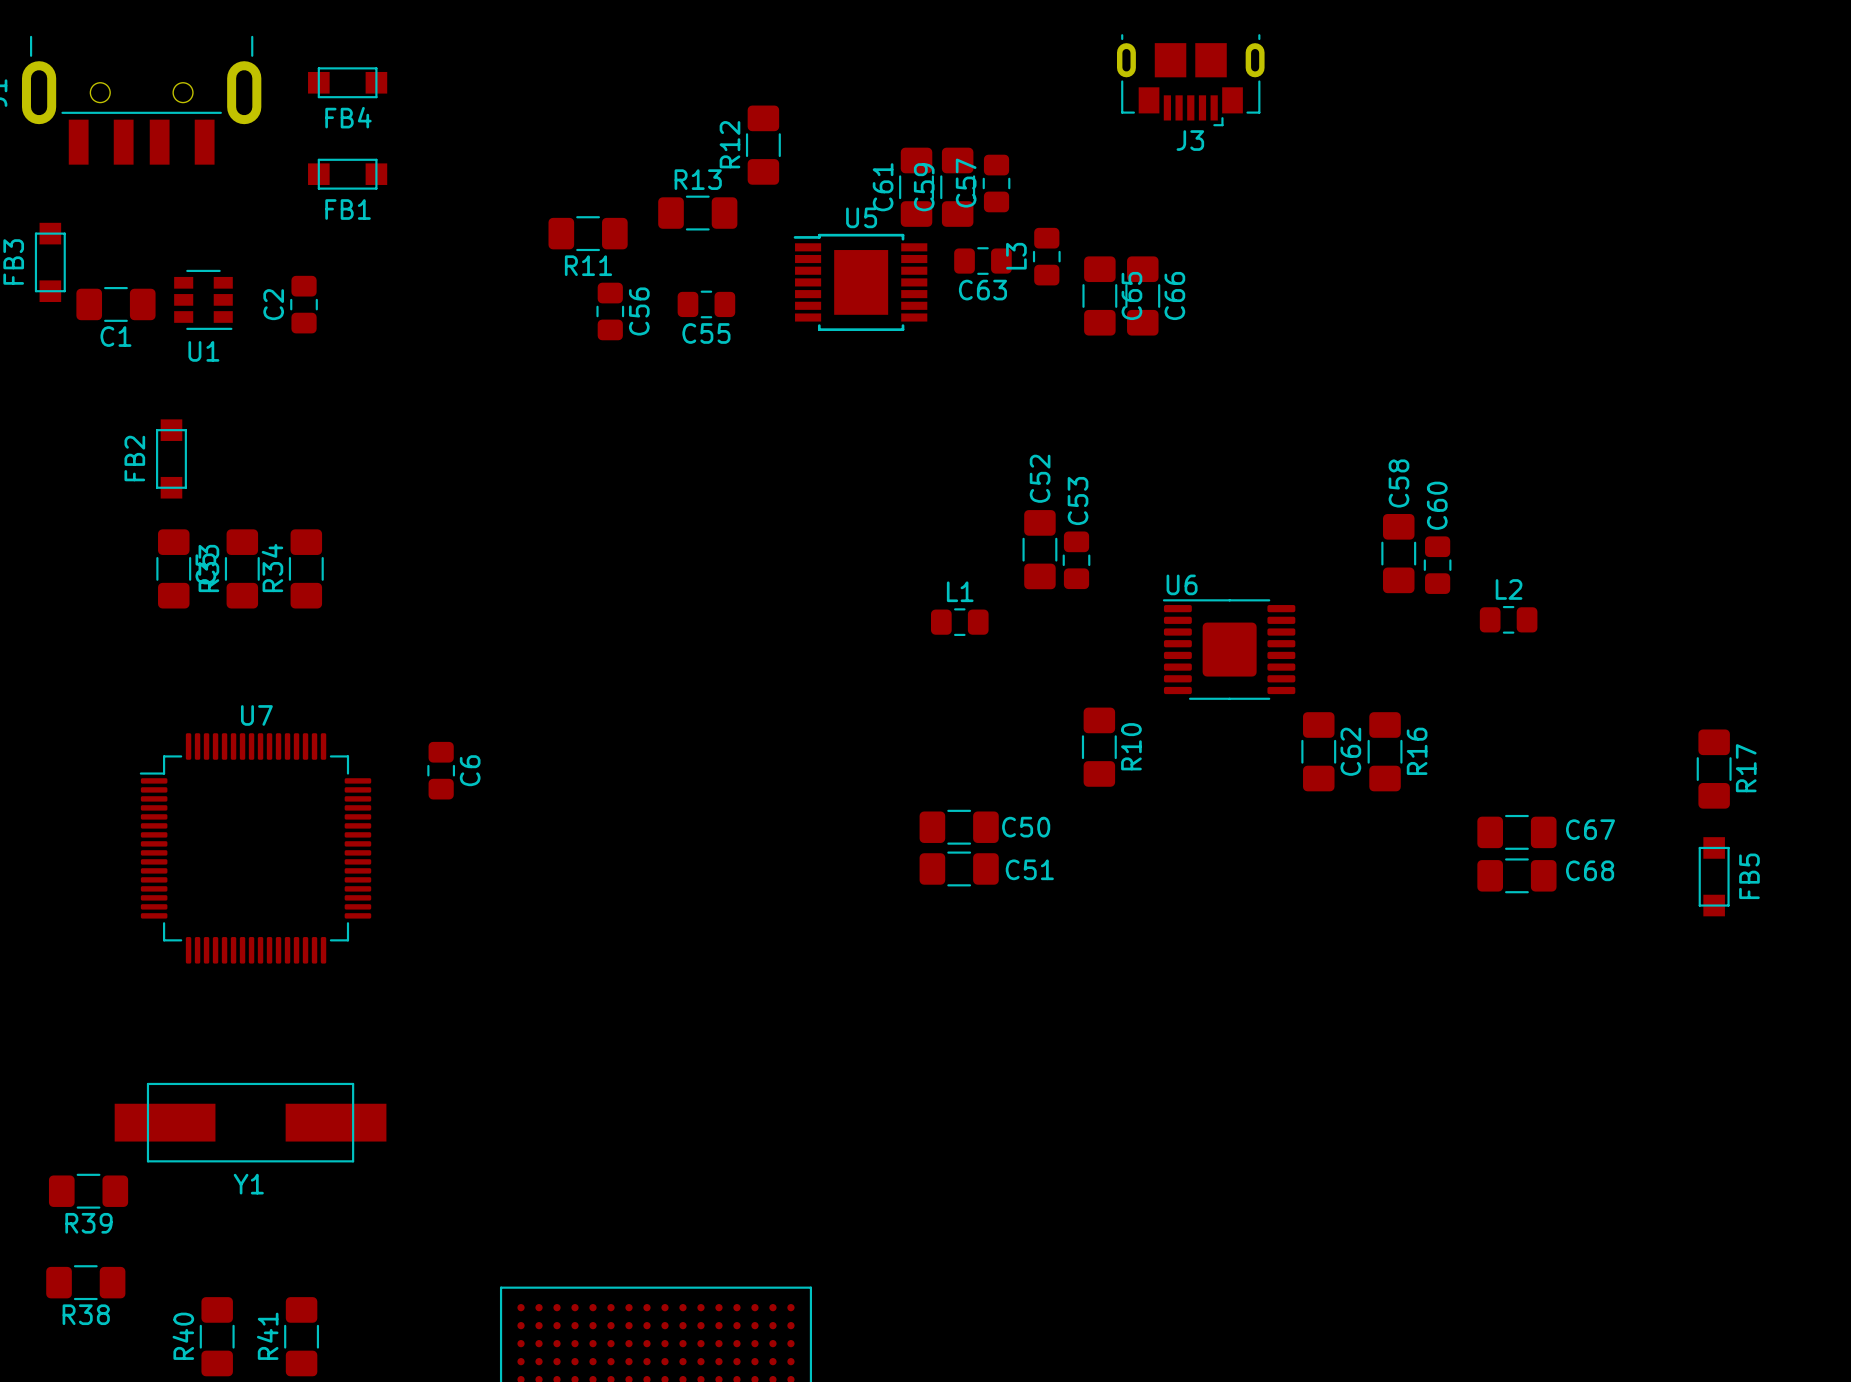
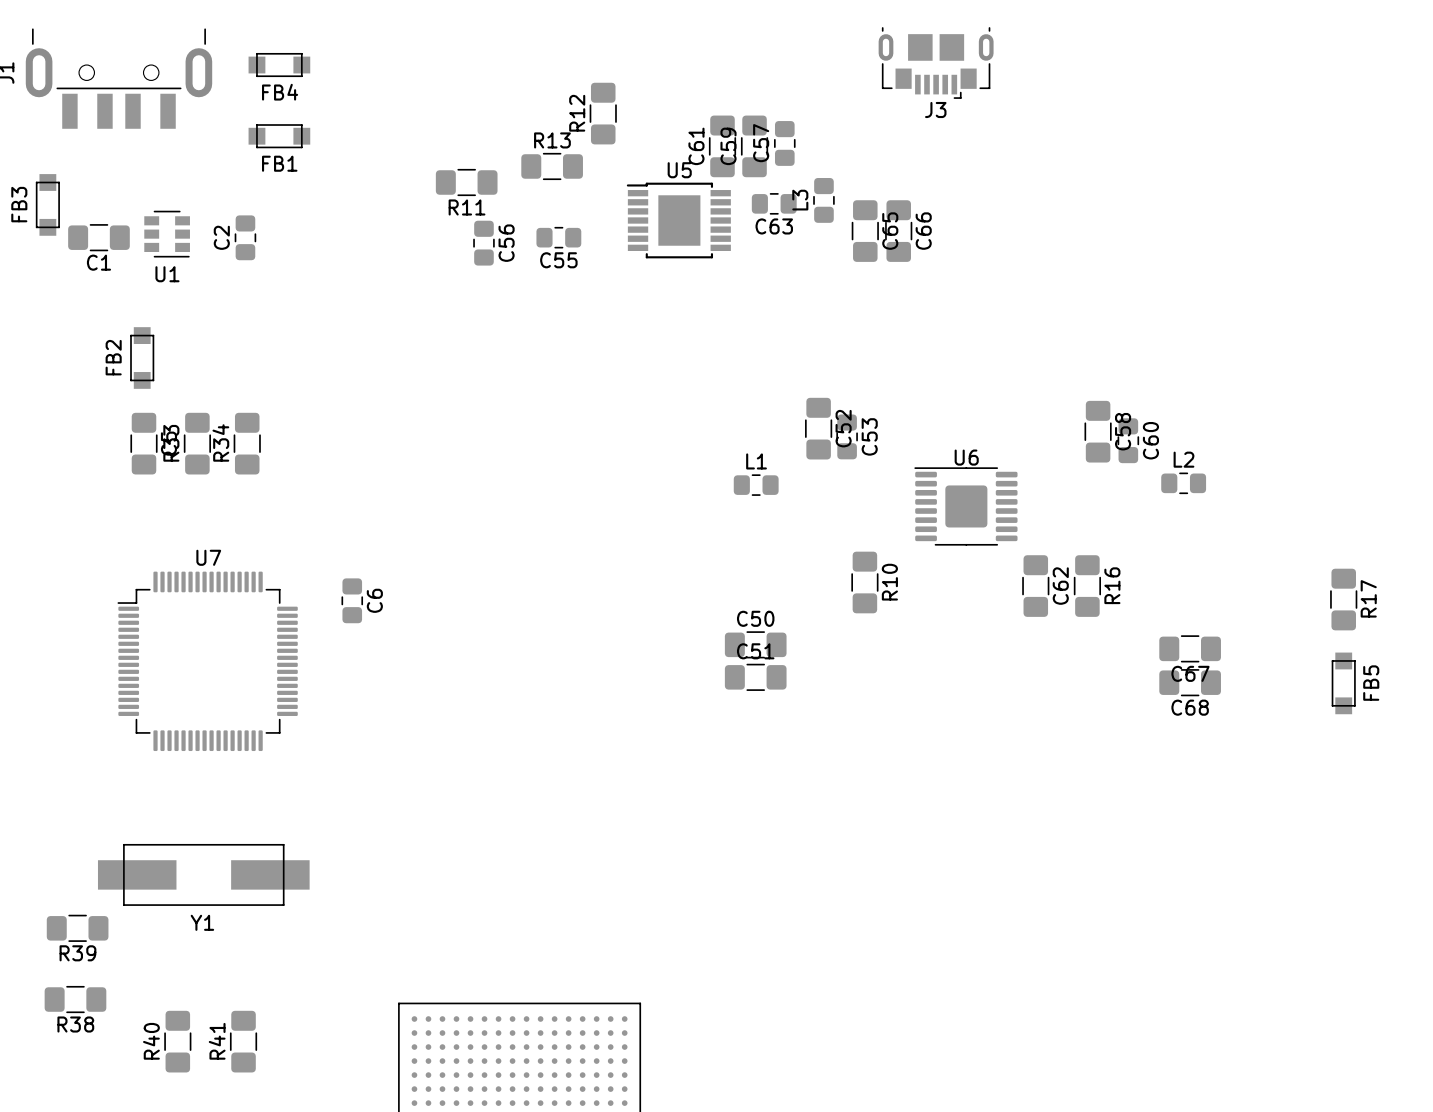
C52 name position: C52 (1040, 478) -> C52 (843, 428)
C58 name position: C58 (1398, 483) -> C58 (1123, 431)
C53 name position: C53 (1078, 501) -> C53 (869, 436)
C60 name position: C60 (1437, 505) -> C60 (1150, 440)
U6 name position: U6 (1182, 584) -> U6 (966, 457)
C50 name position: C50 (1026, 827) -> C50 (755, 618)
C67 name position: C67 (1590, 829) -> C67 (1190, 673)
C51 name position: C51 (1029, 869) -> C51 (755, 651)
C68 name position: C68 (1590, 870) -> C68 (1190, 707)

